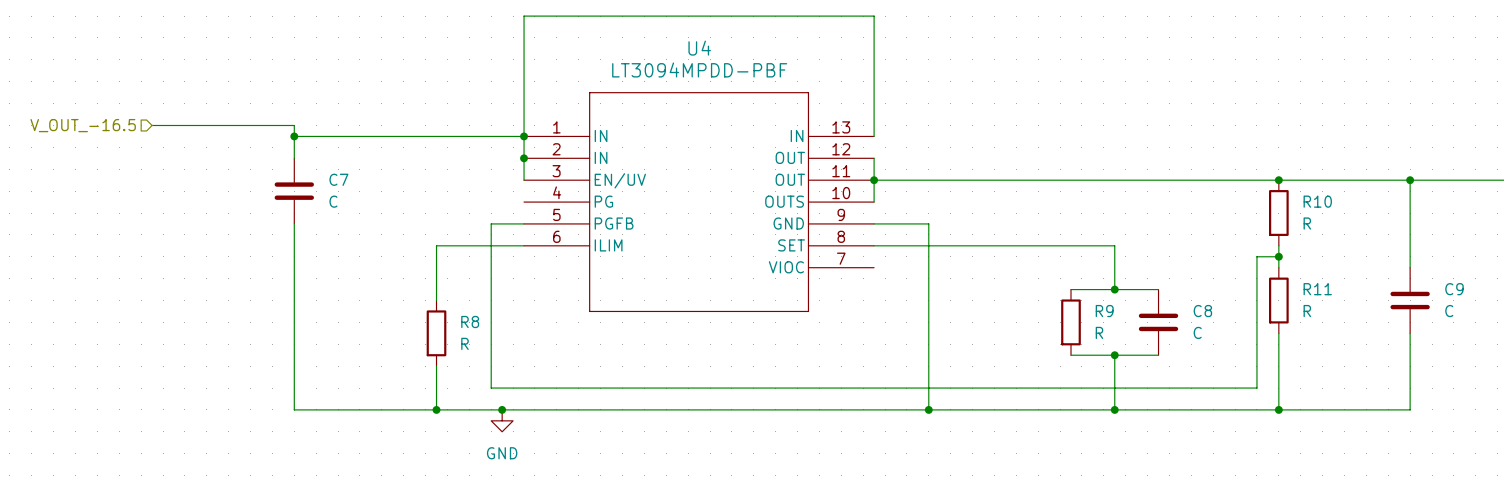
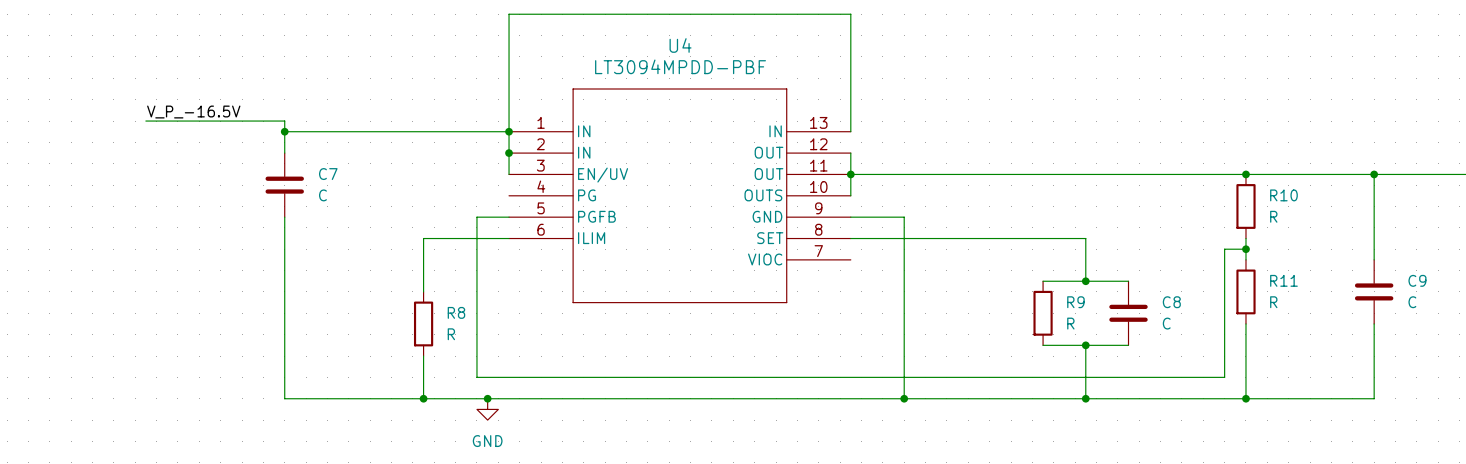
label: none -> V_P_-16.5V (193, 112)
hierarchical label: V_OUT_-16.5 (83, 125) -> none

